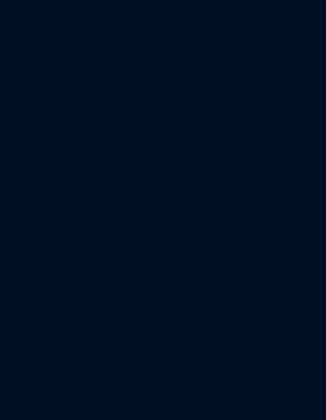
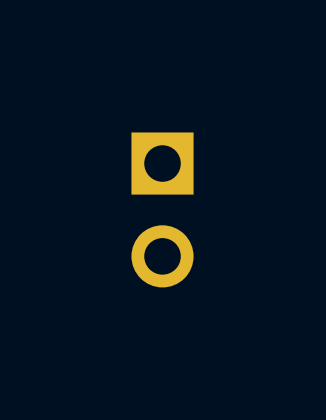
part: none -> (162, 209)

